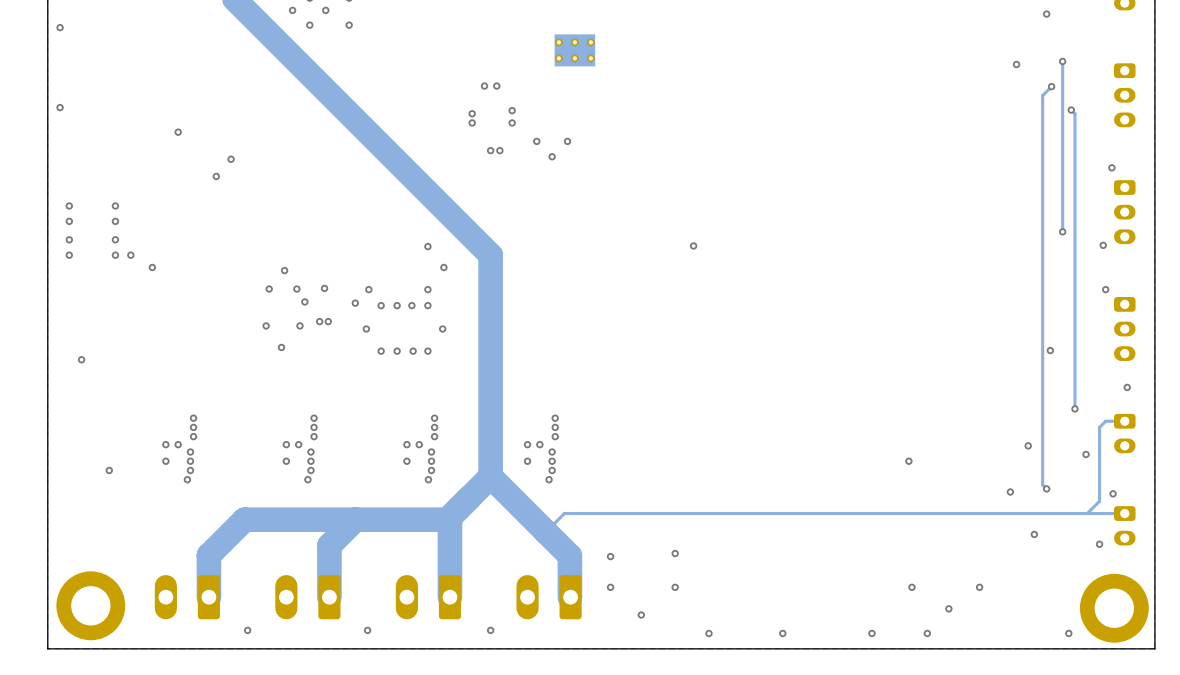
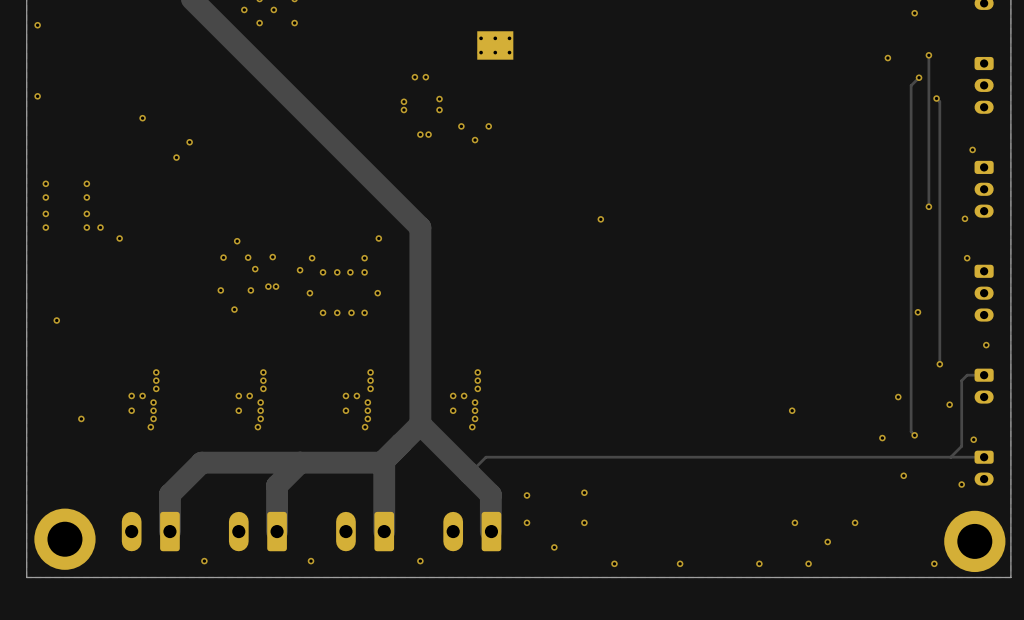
via: (427, 246) -> none

